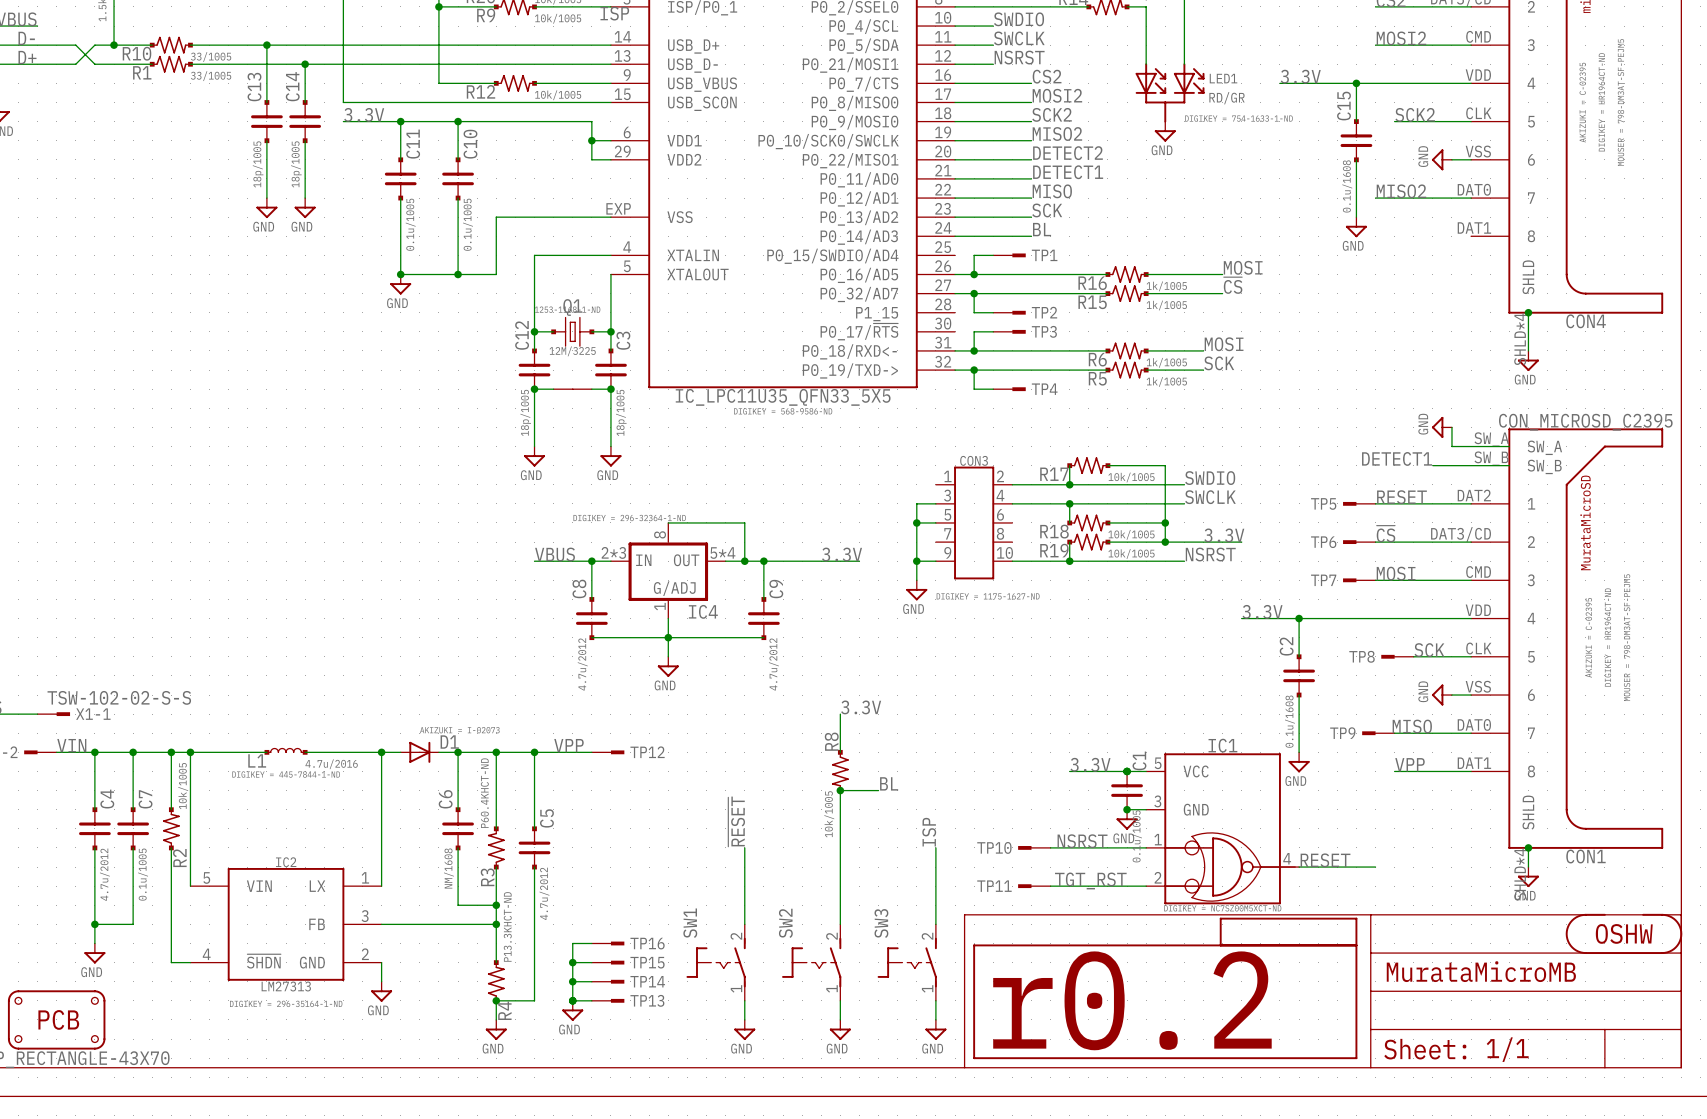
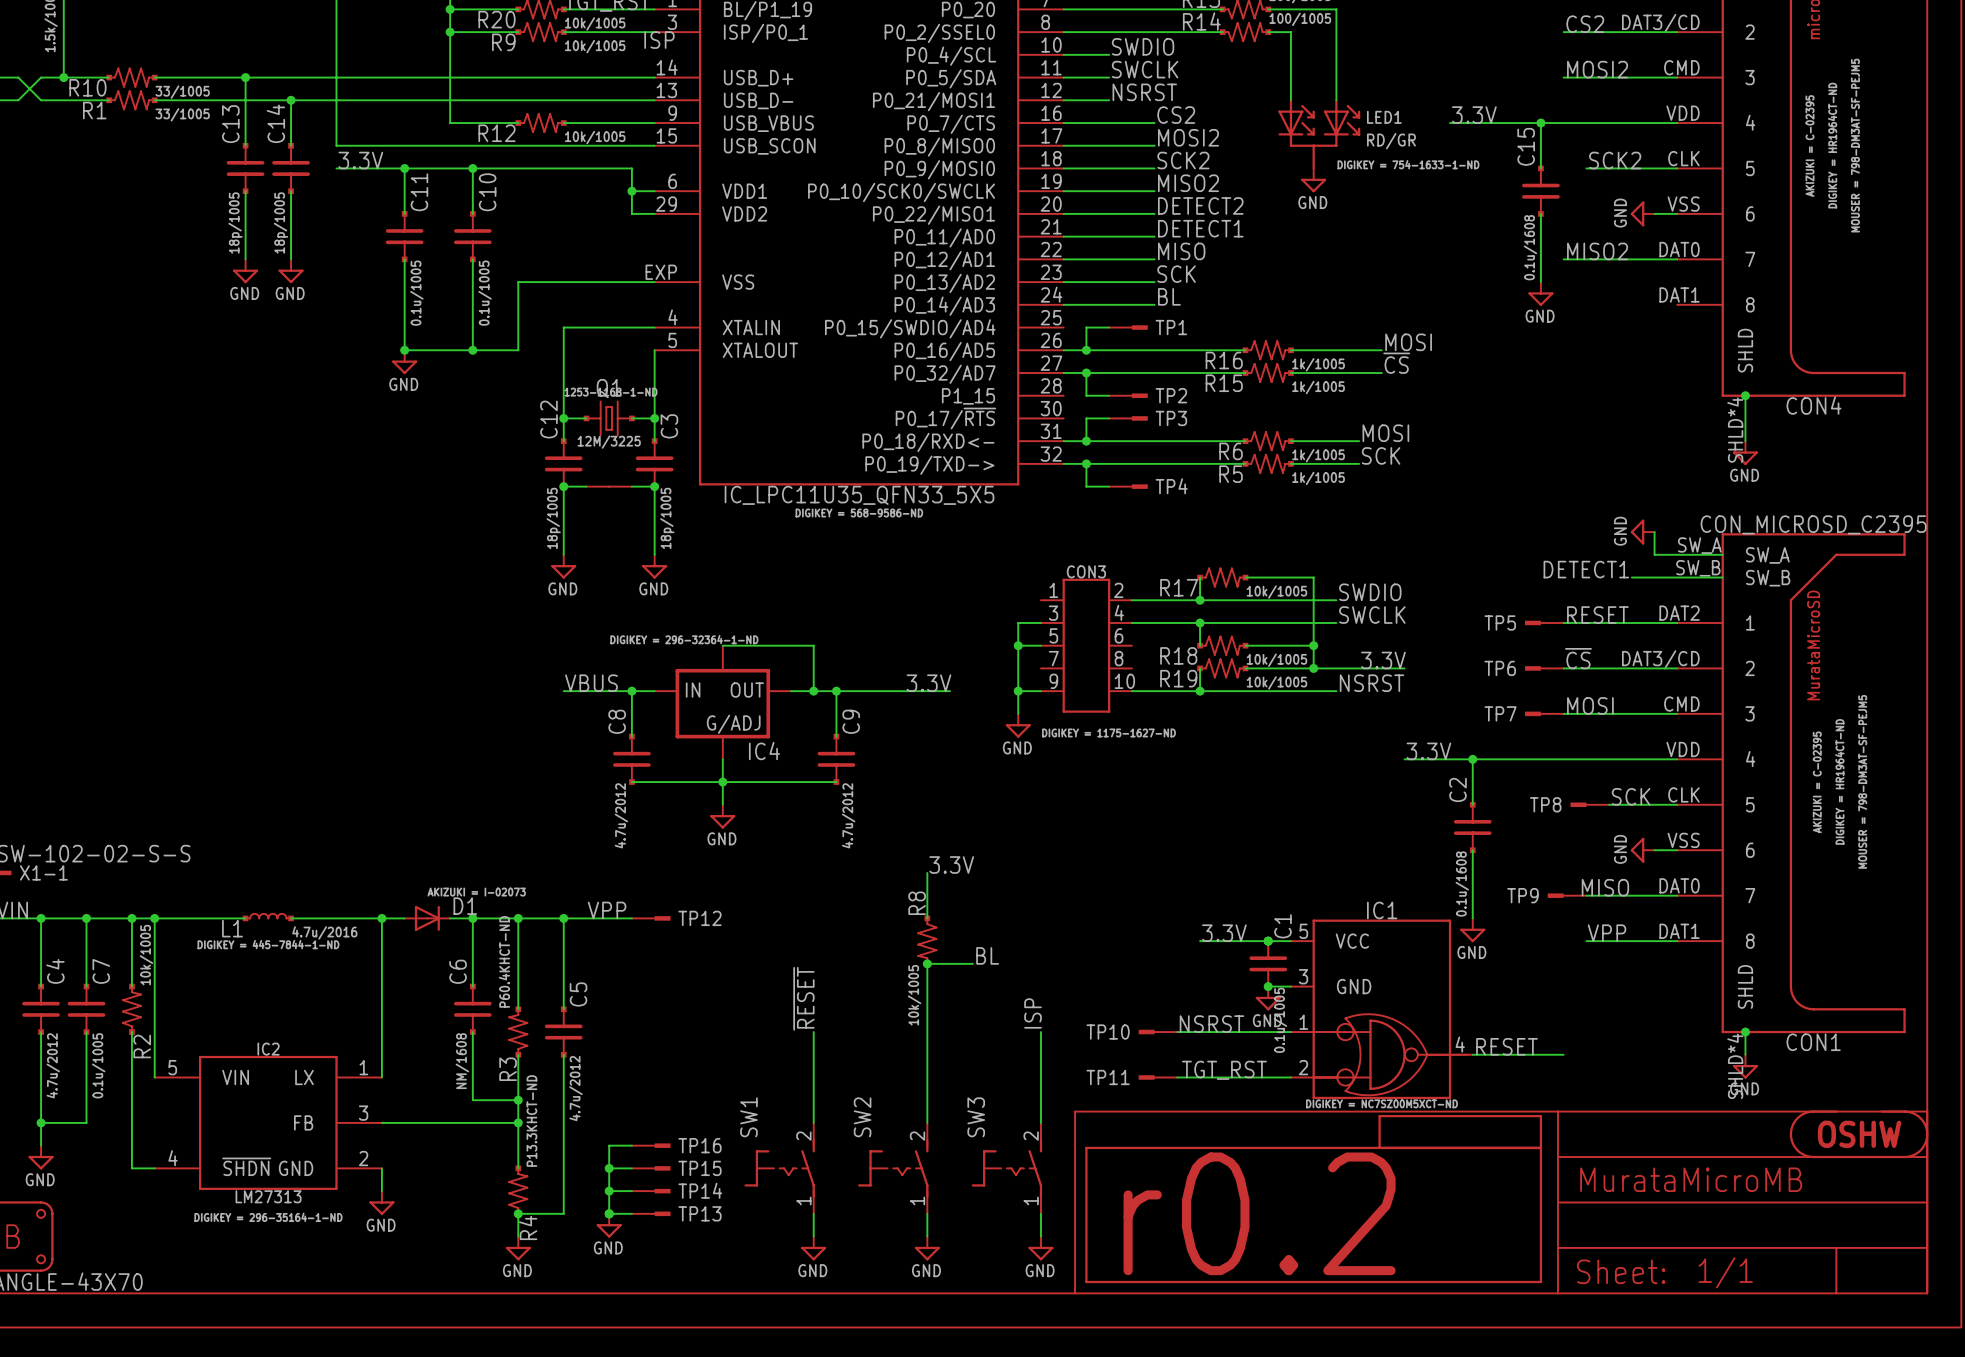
IC4 pin number: 8 (660, 534) -> none
IC4 pin number: 2*3 (613, 552) -> none
IC4 pin number: 5*4 (722, 553) -> none
IC4 pin number: 1 (660, 606) -> none

